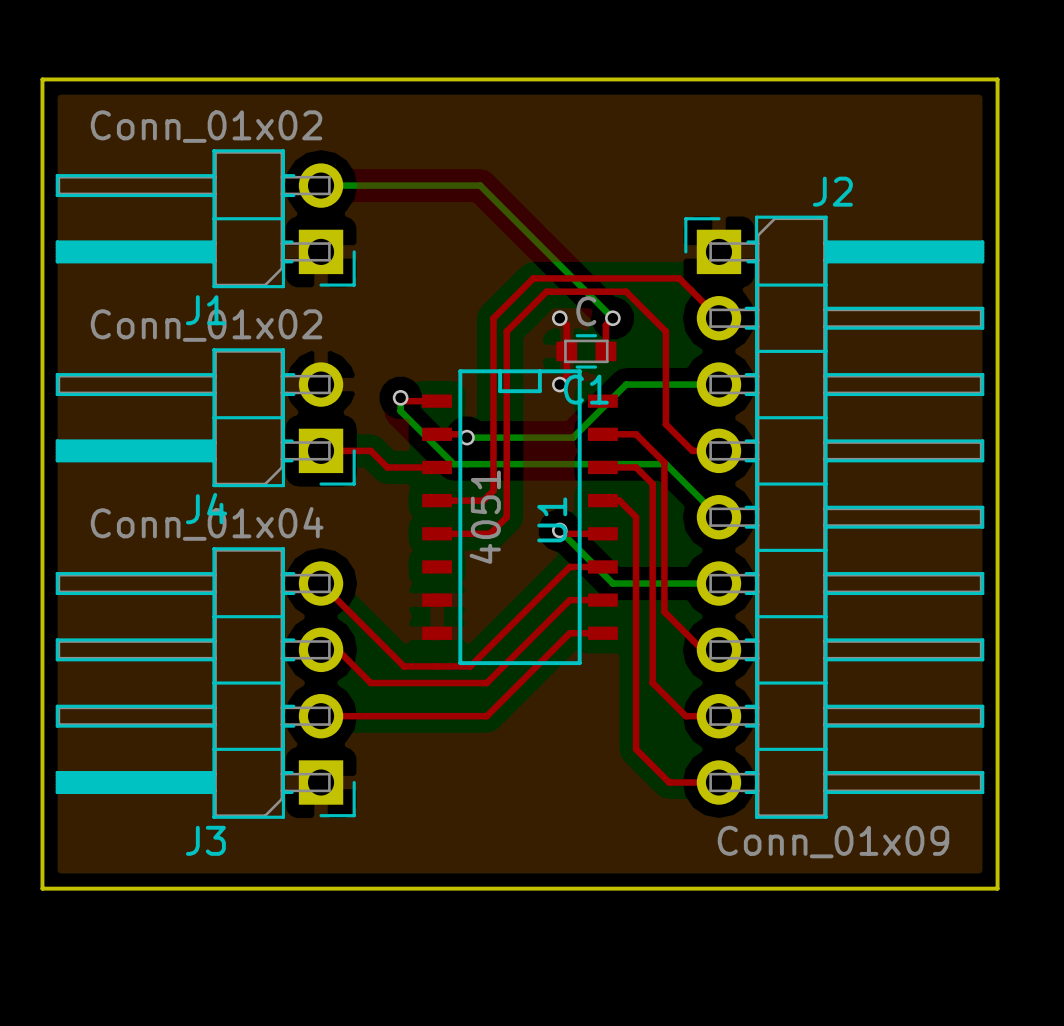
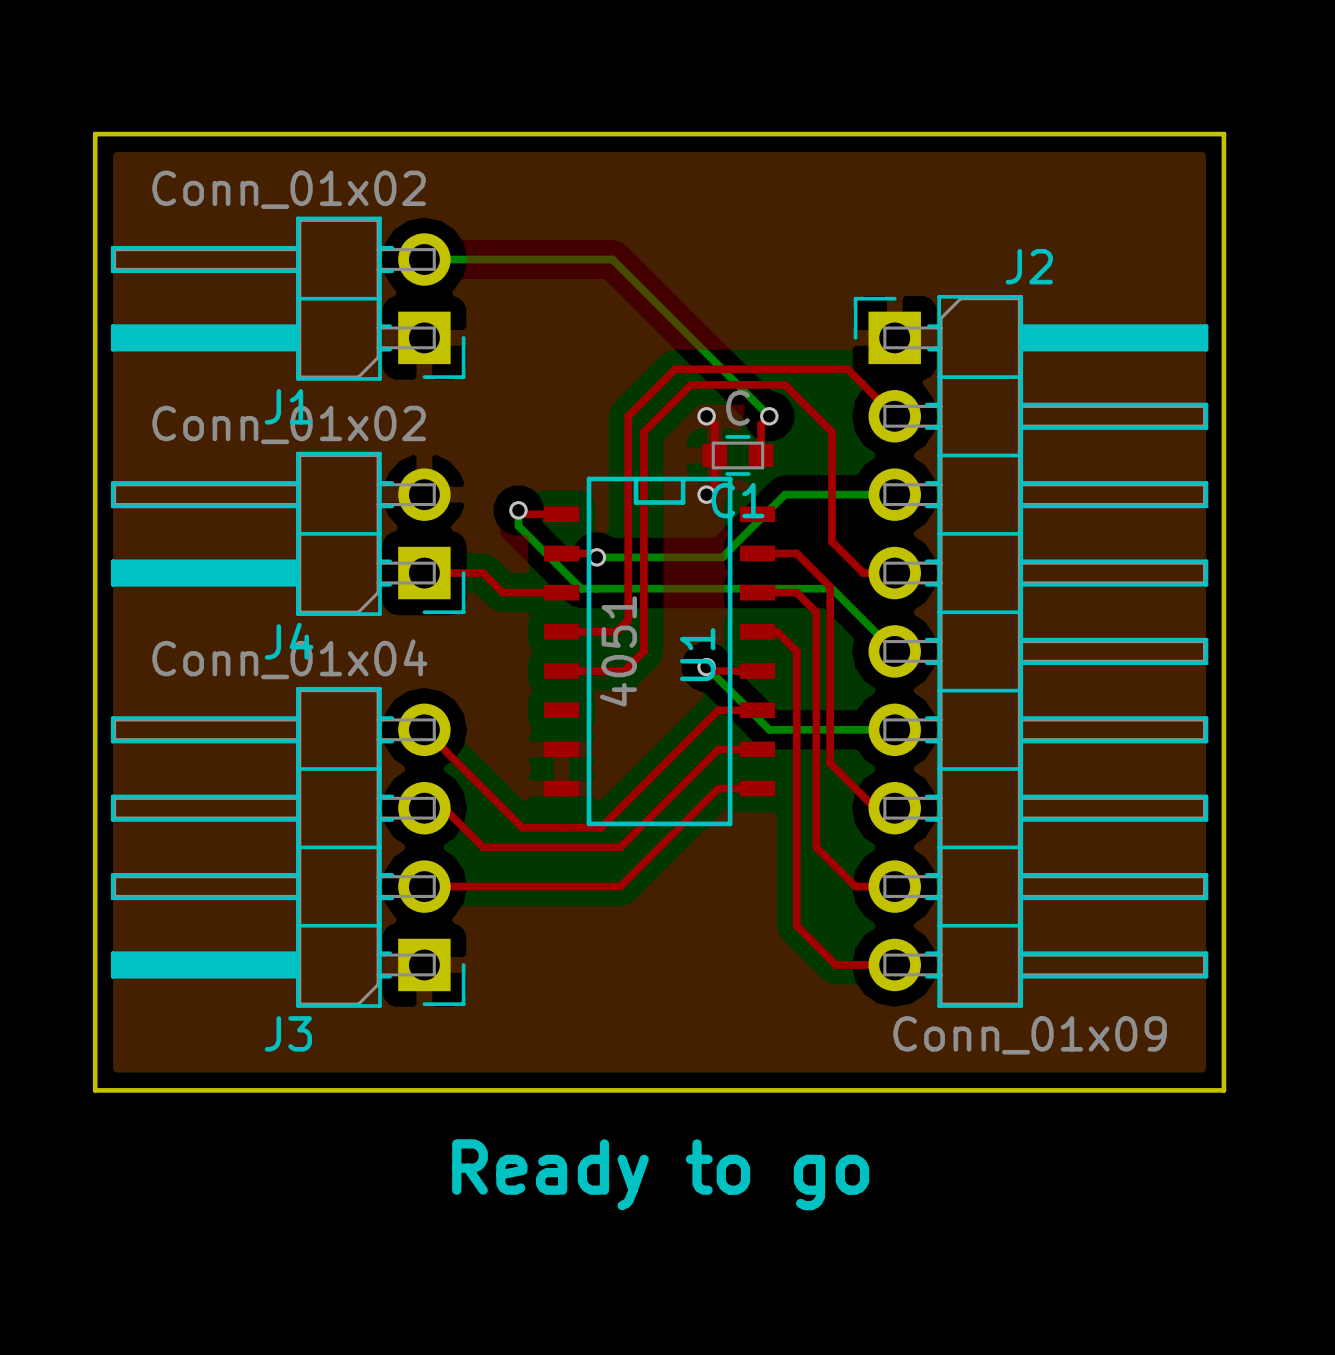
text: none -> Ready to go (660, 1174)

